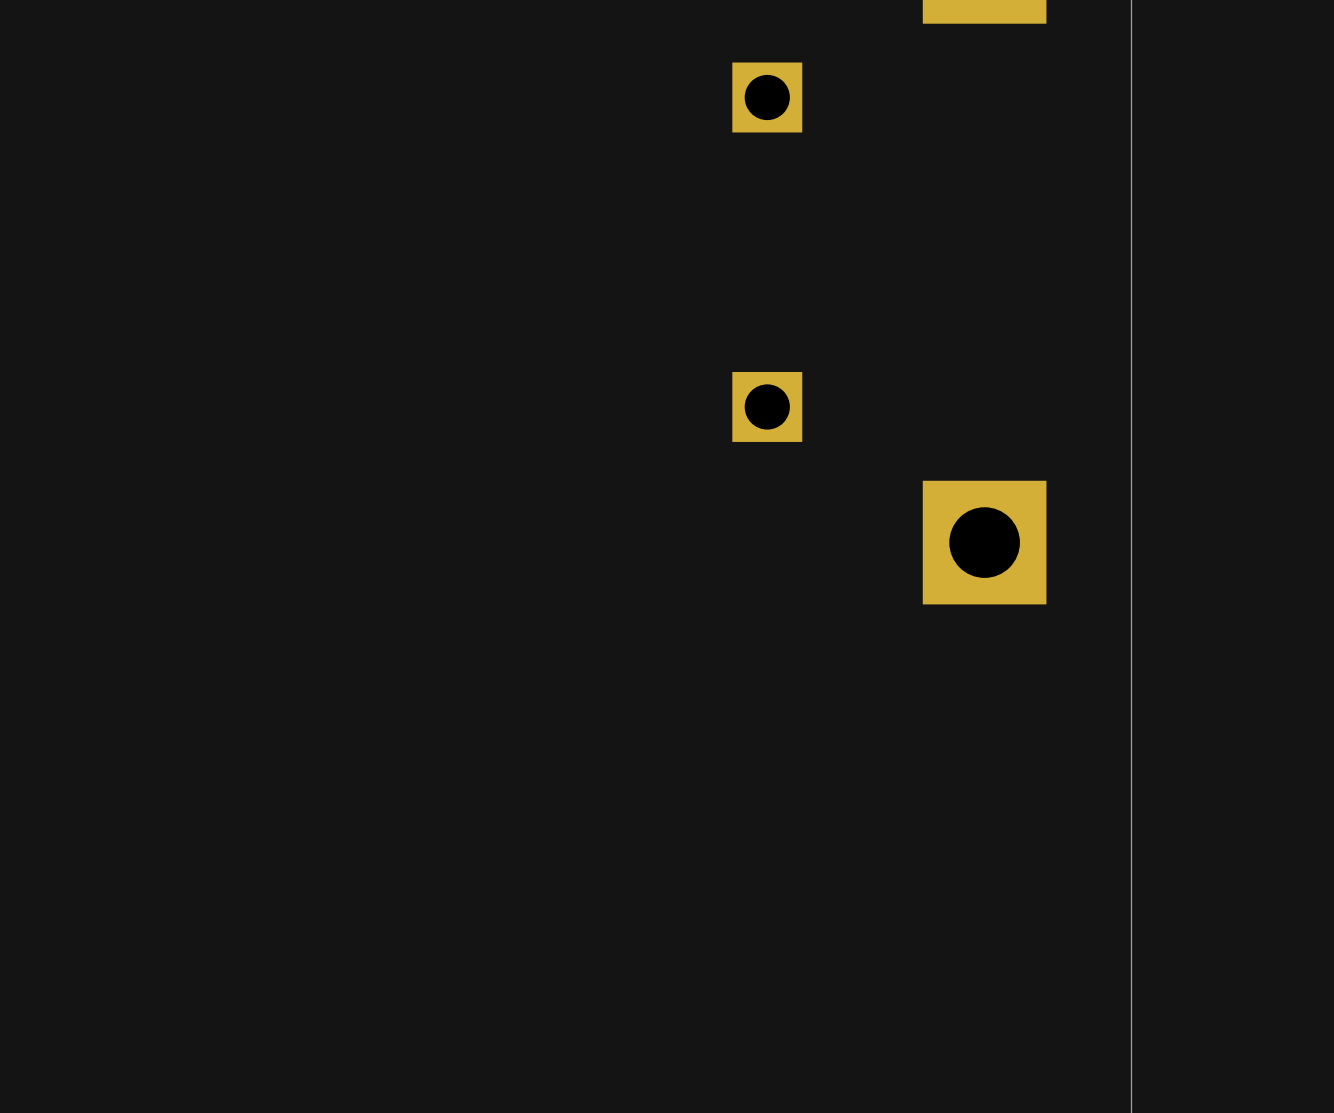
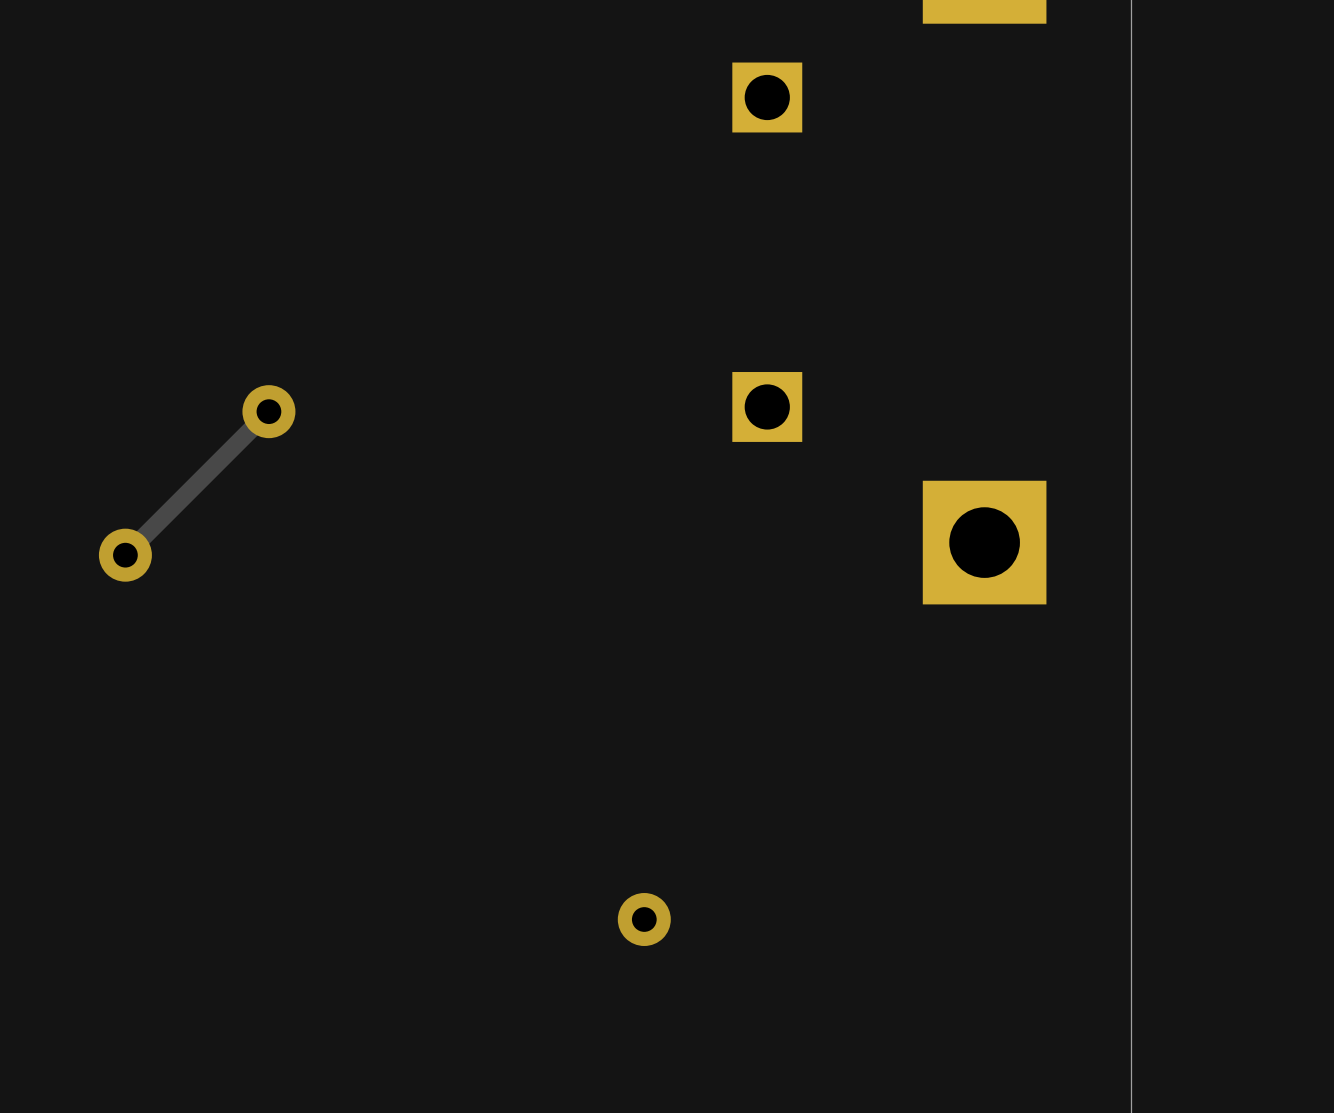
track: none -> (268, 411) (125, 555)
via: none -> (268, 411)
via: none -> (125, 555)
via: none -> (644, 919)

